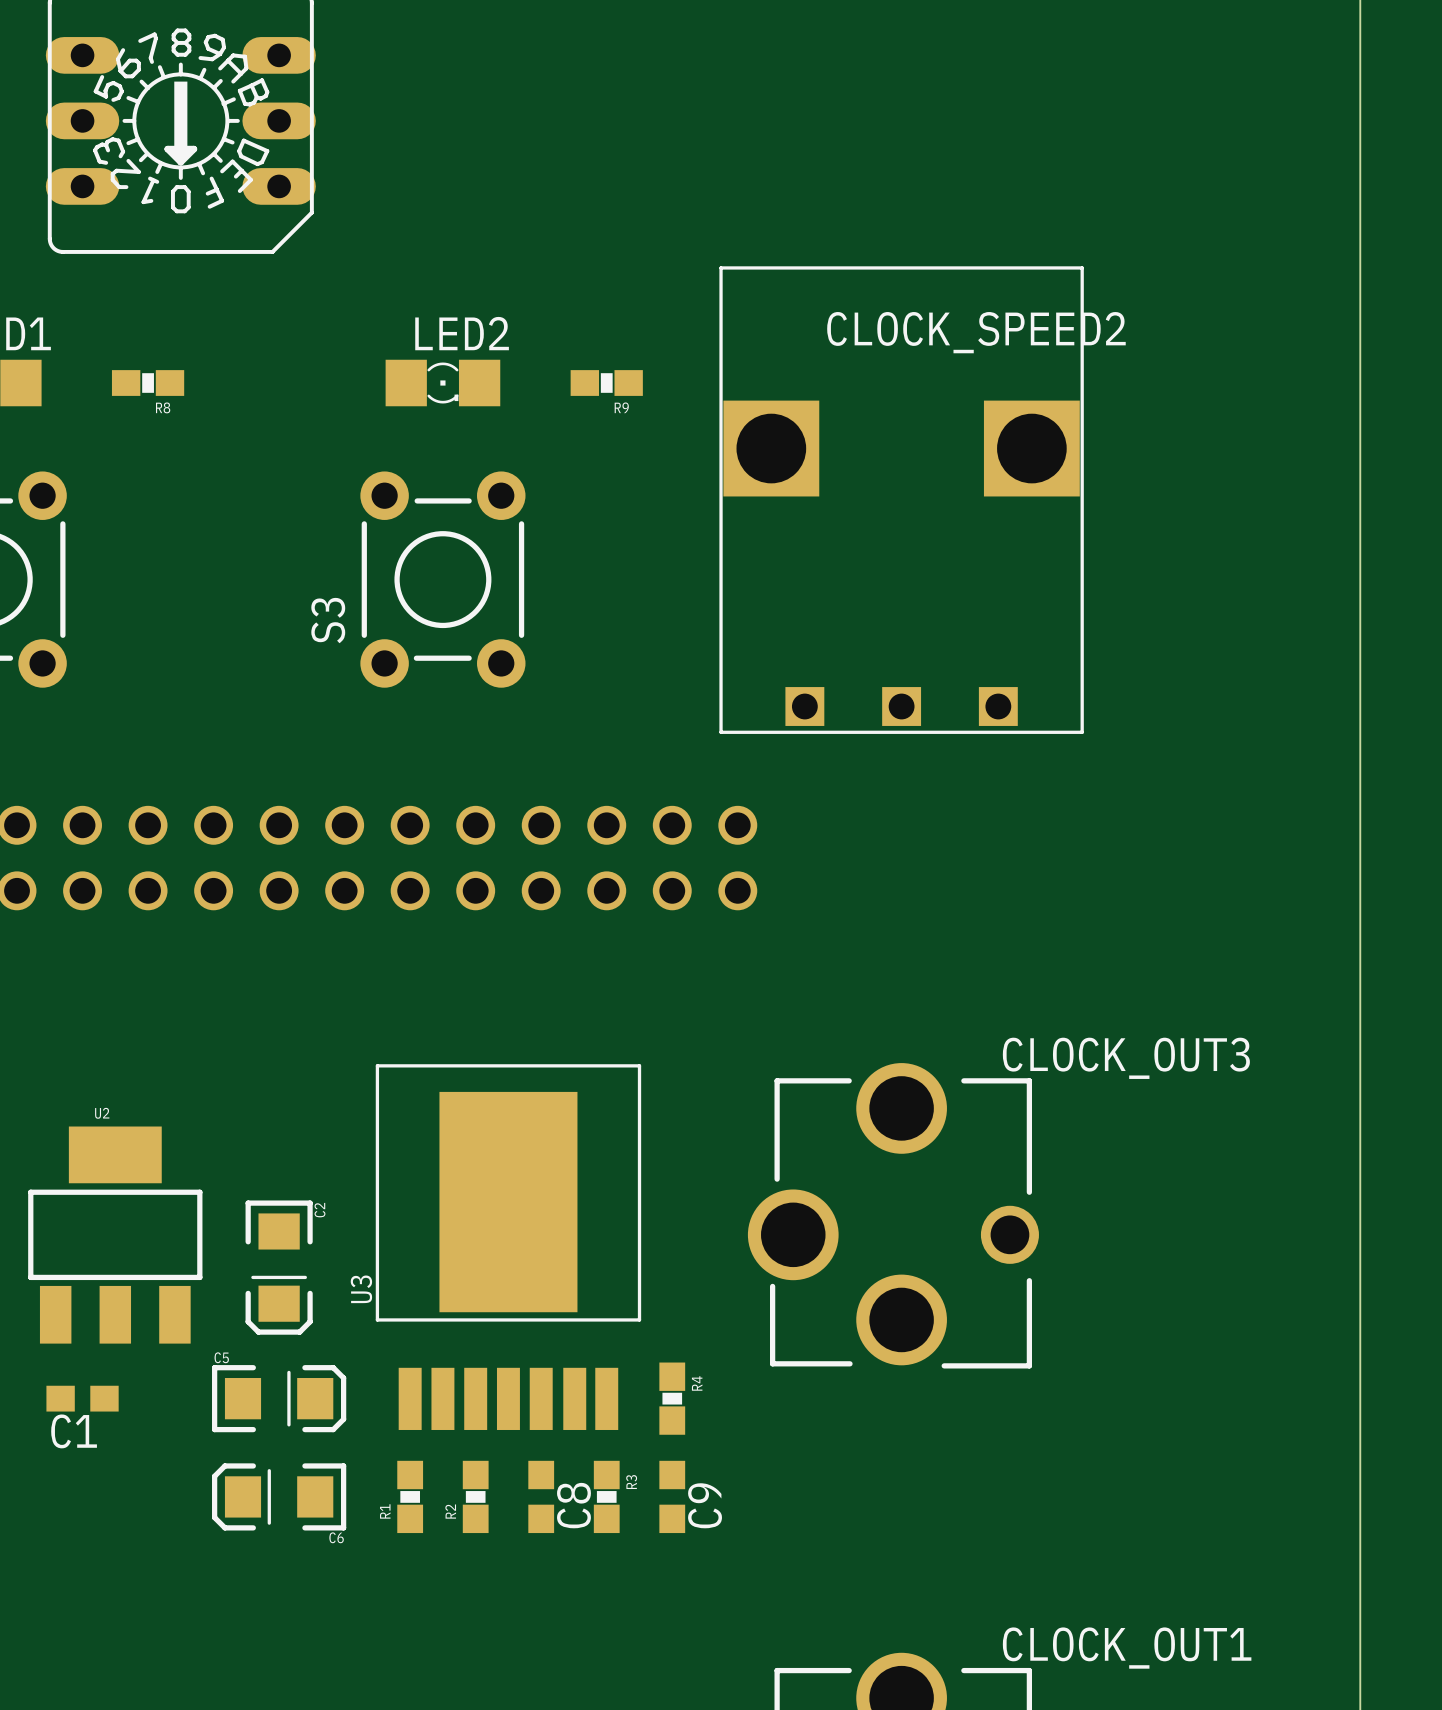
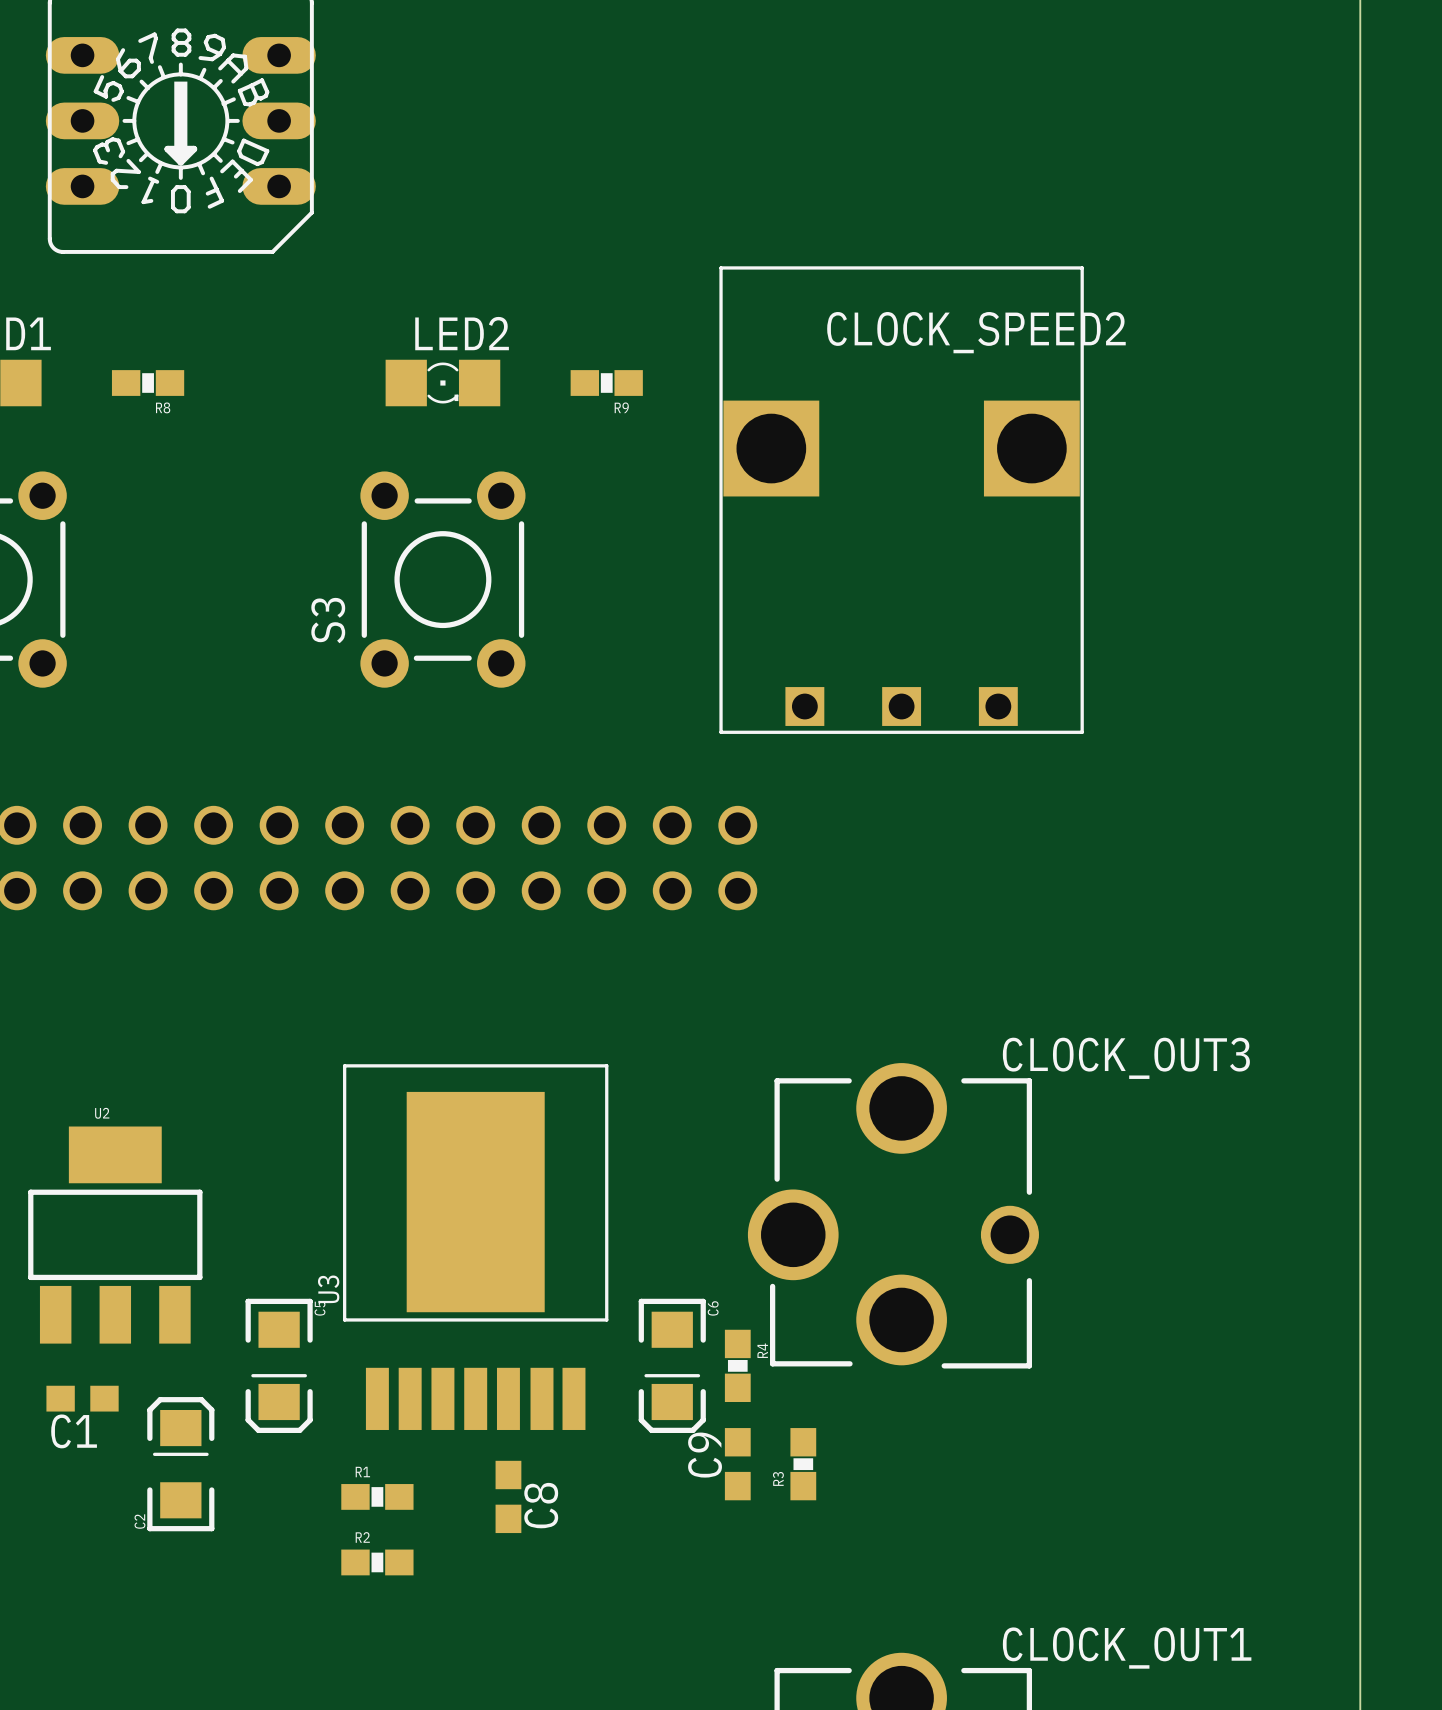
U3 position: (508, 1247) -> (475, 1247)
C2 rotation: 0° (279, 1267) -> 180° (180, 1464)
C2 position: (279, 1267) -> (180, 1464)
C5 rotation: 0° (279, 1398) -> 90° clockwise (279, 1365)
R4 position: (672, 1398) -> (737, 1365)
R3 name position: R3 (631, 1482) -> R3 (778, 1478)
C6 rotation: 0° (279, 1496) -> 90° counterclockwise (672, 1365)
C6 position: (279, 1496) -> (672, 1365)
R1 rotation: 0° (410, 1496) -> 90° clockwise (377, 1496)
R2 rotation: 0° (475, 1496) -> 90° clockwise (377, 1562)
R2 position: (475, 1496) -> (377, 1562)
C8 position: (541, 1496) -> (508, 1496)
R3 position: (606, 1496) -> (803, 1464)
C9 position: (672, 1496) -> (737, 1464)
C9 name position: C9 (705, 1505) -> C9 (705, 1455)

